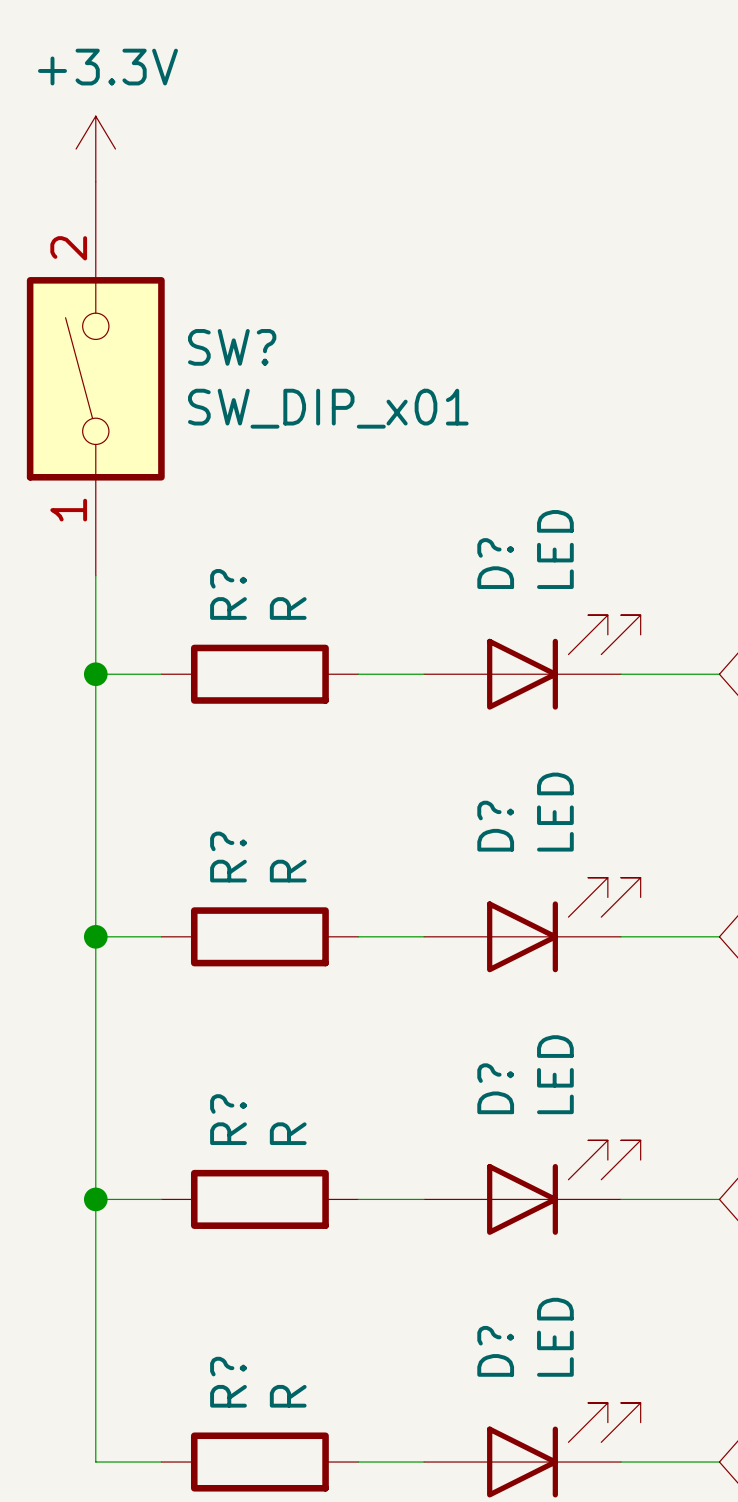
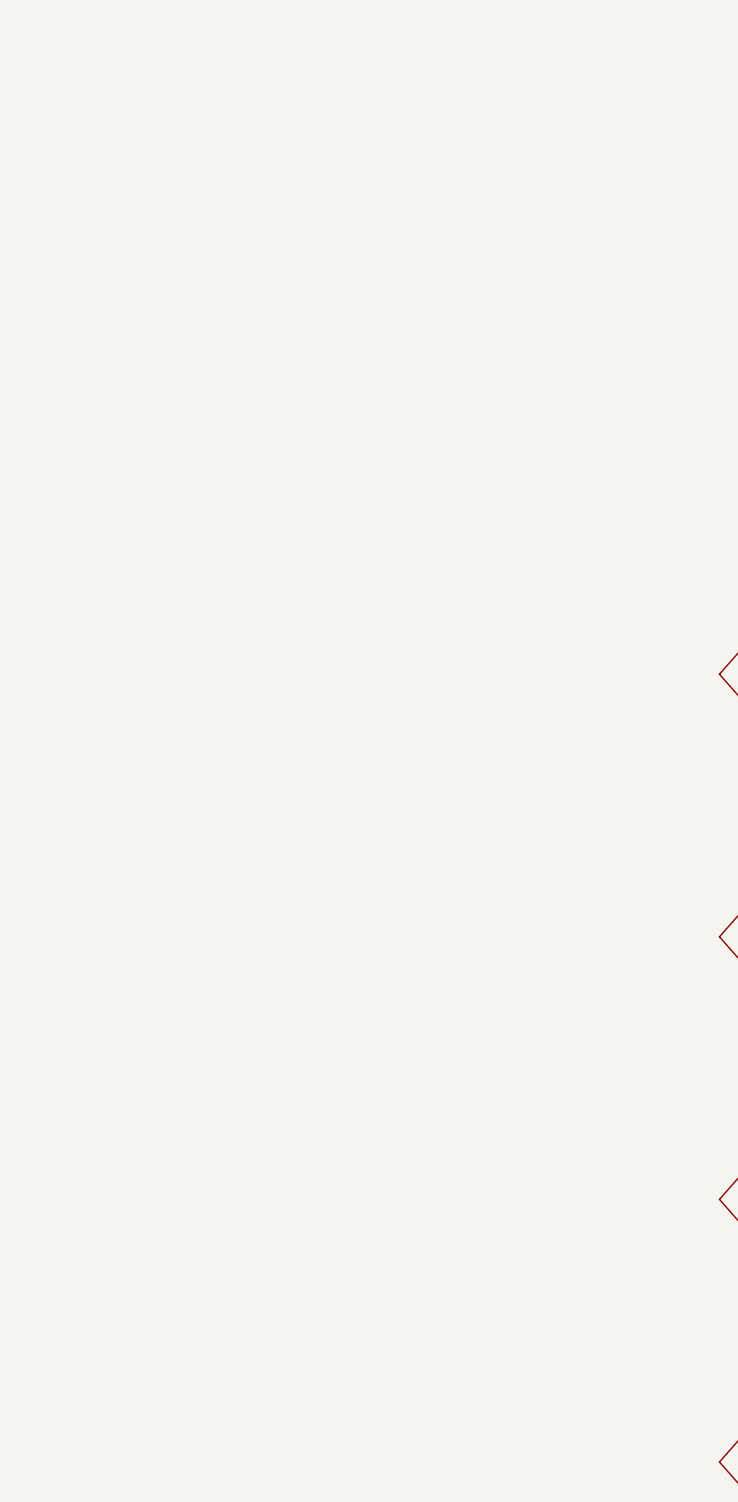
power symbol: +3.3V (95, 149) -> none
SW?: SW_DIP_x01 (95, 378) -> none
wire: (95, 575) (95, 1462) (161, 1462) -> none
D?: LED (532, 662) -> none
wire: (95, 674) (161, 674) -> none
junction: (95, 674) -> none
R?: R (259, 674) -> none
wire: (358, 674) (424, 674) -> none
wire: (620, 674) (719, 674) -> none
D?: LED (532, 925) -> none
wire: (95, 936) (161, 936) -> none
junction: (95, 936) -> none
R?: R (259, 936) -> none
wire: (358, 936) (424, 936) -> none
wire: (620, 936) (719, 936) -> none
D?: LED (532, 1187) -> none
wire: (95, 1199) (161, 1199) -> none
junction: (95, 1199) -> none
R?: R (259, 1199) -> none
wire: (358, 1199) (424, 1199) -> none
wire: (620, 1199) (719, 1199) -> none
D?: LED (532, 1450) -> none
R?: R (259, 1462) -> none
wire: (358, 1462) (424, 1462) -> none
wire: (620, 1462) (719, 1462) -> none

